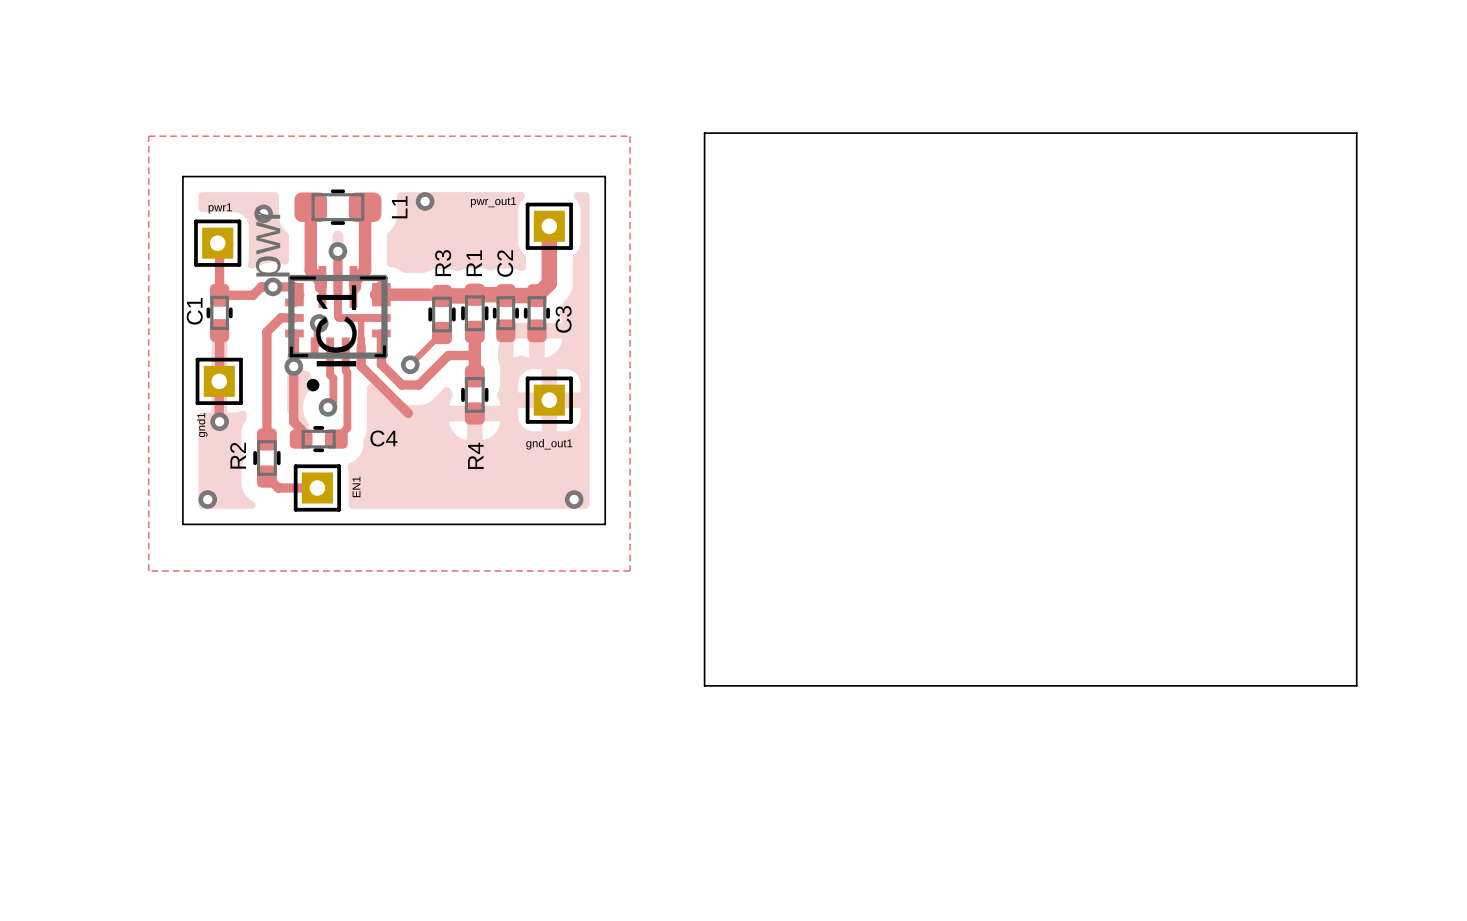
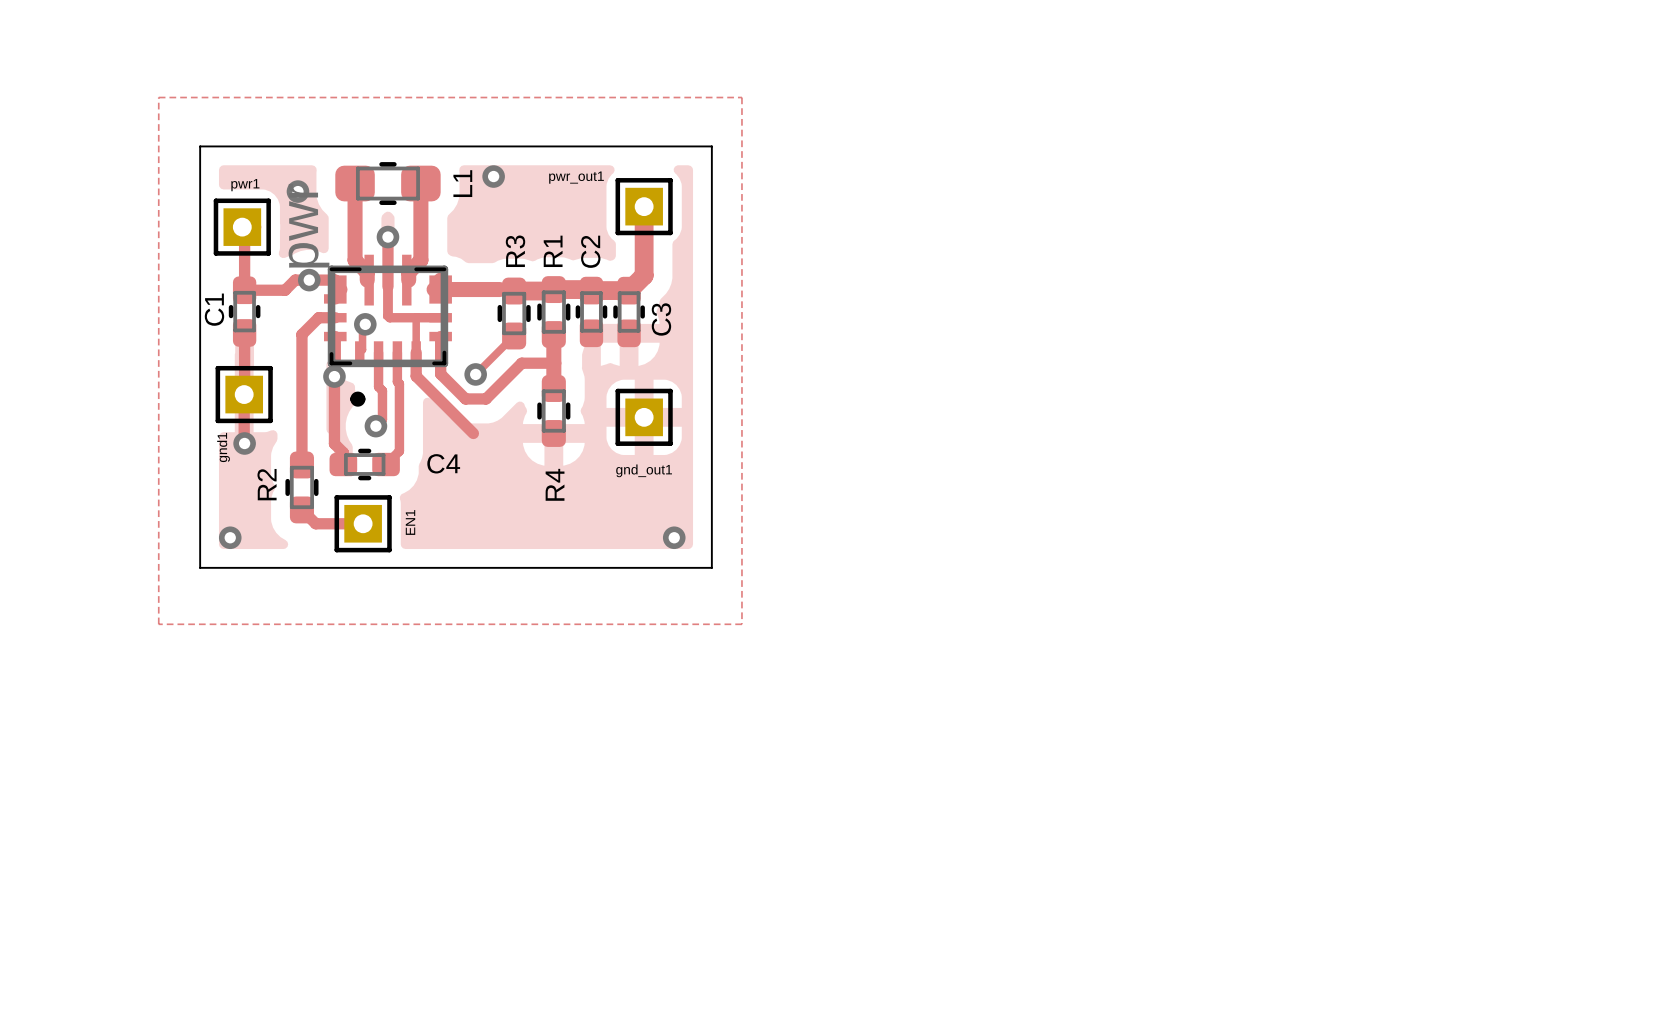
board edge: (704, 133) (1356, 133) (1356, 685) (704, 685) (704, 133) -> none
IC1 name: IC1 (336, 325) -> none

